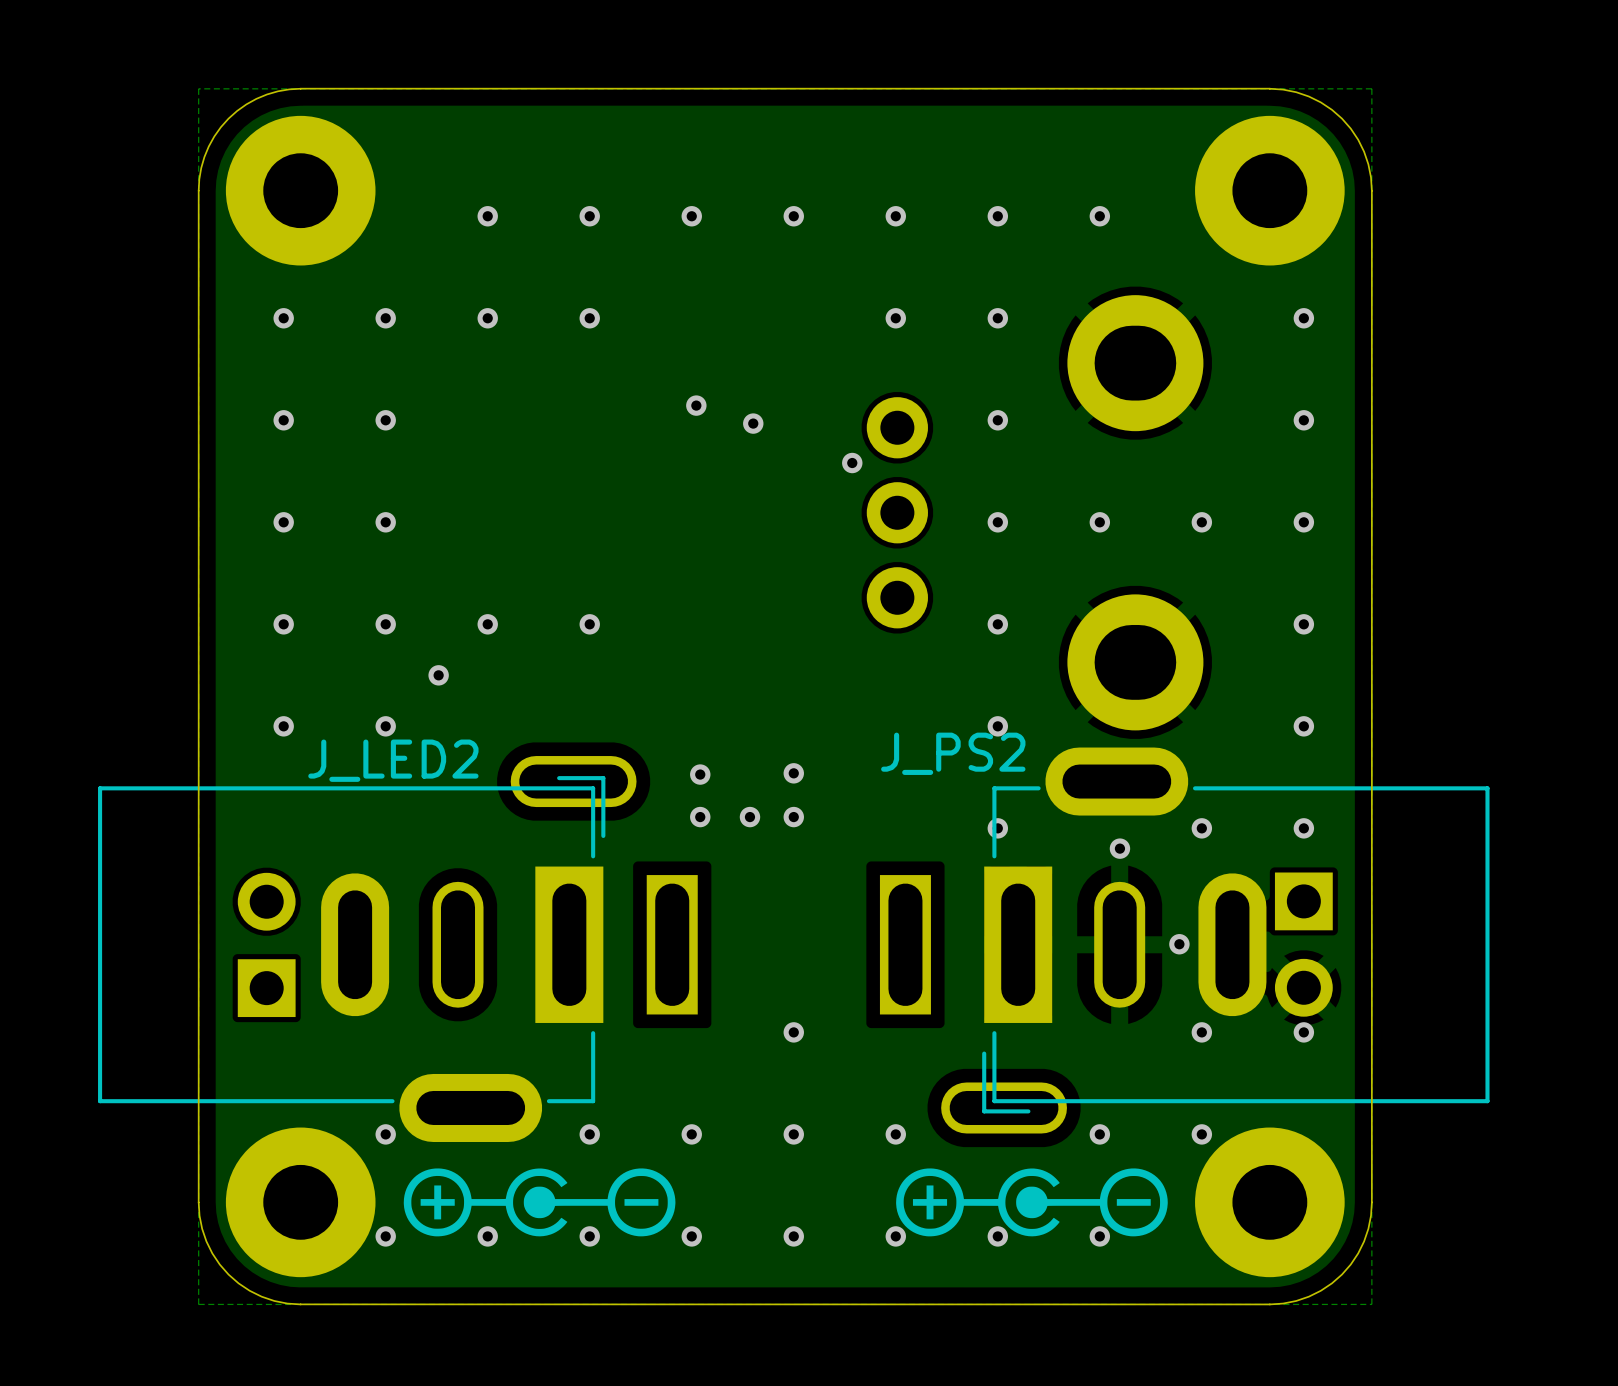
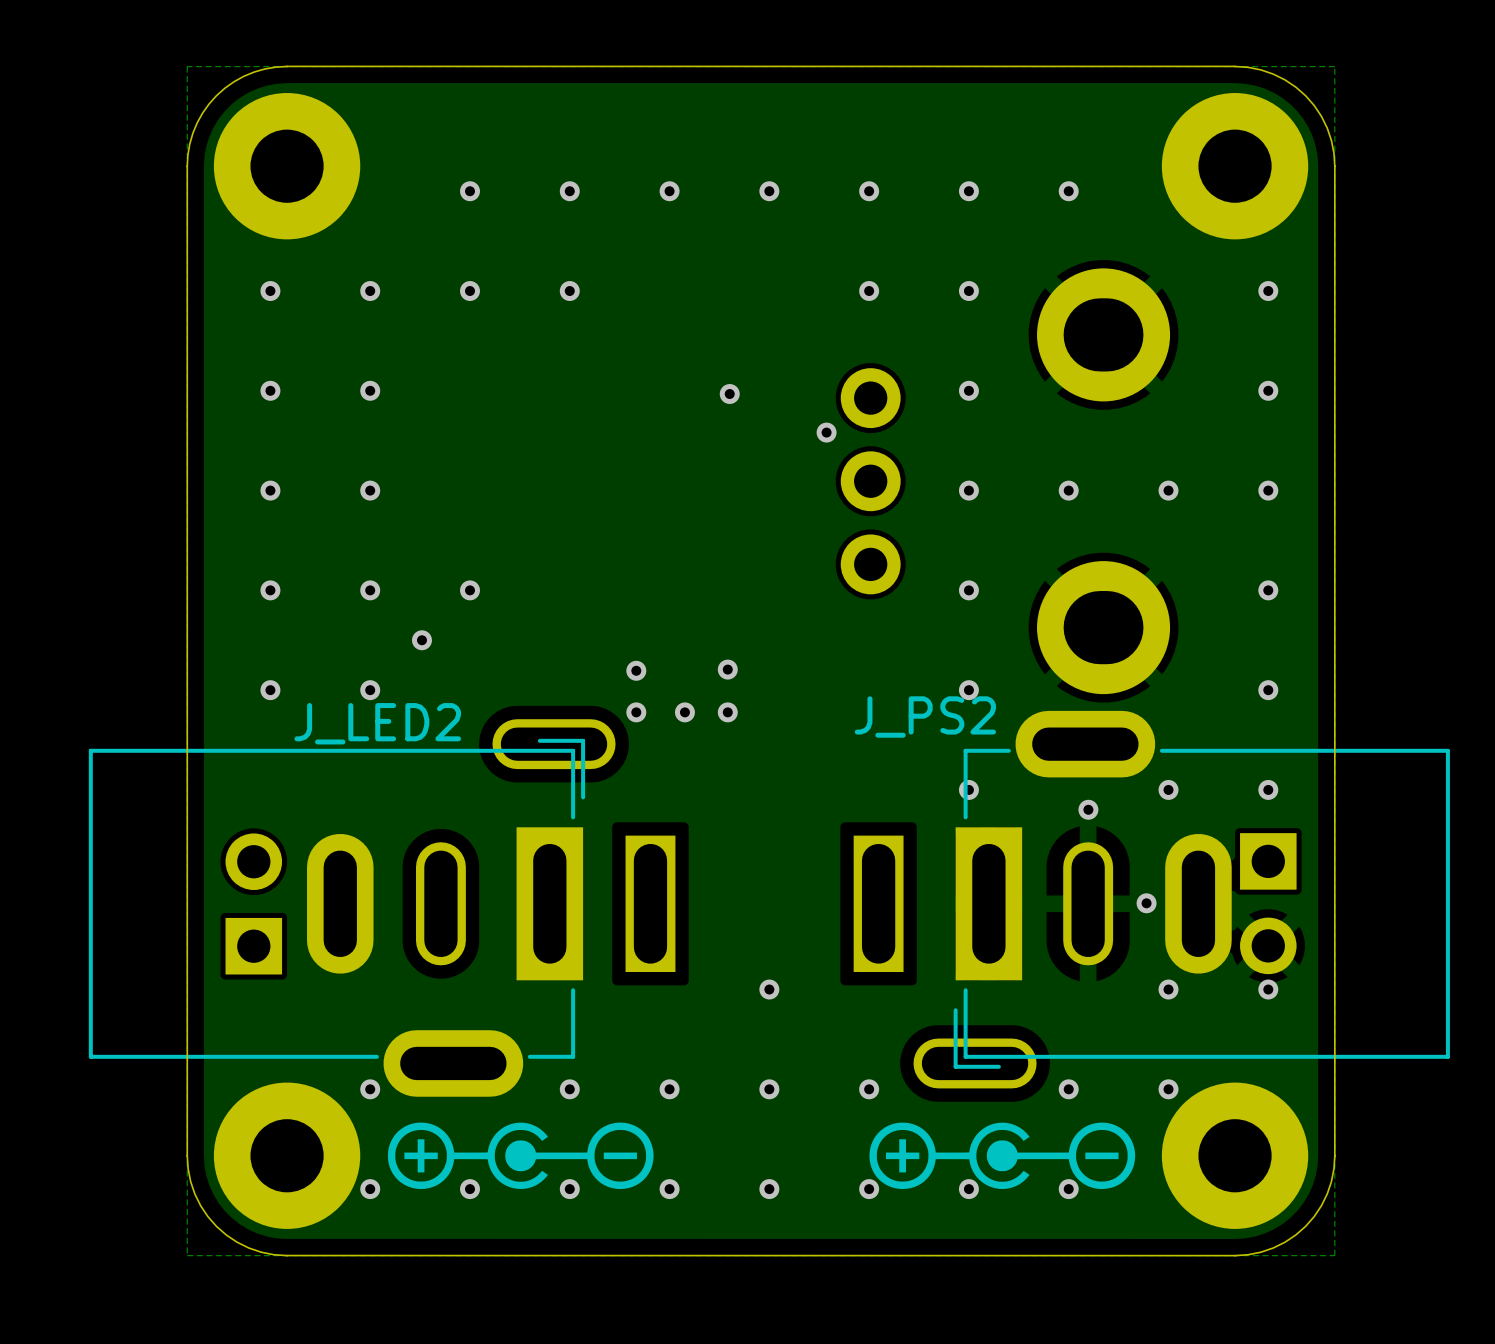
via: (696, 405) -> none
via: (589, 624) -> none
via: none -> (727, 669)
via: none -> (636, 670)
via: none -> (636, 712)
via: none -> (684, 712)
via: none -> (727, 712)
via: (793, 773) -> none
via: (700, 774) -> none
via: (700, 817) -> none
via: (749, 817) -> none
via: (793, 817) -> none

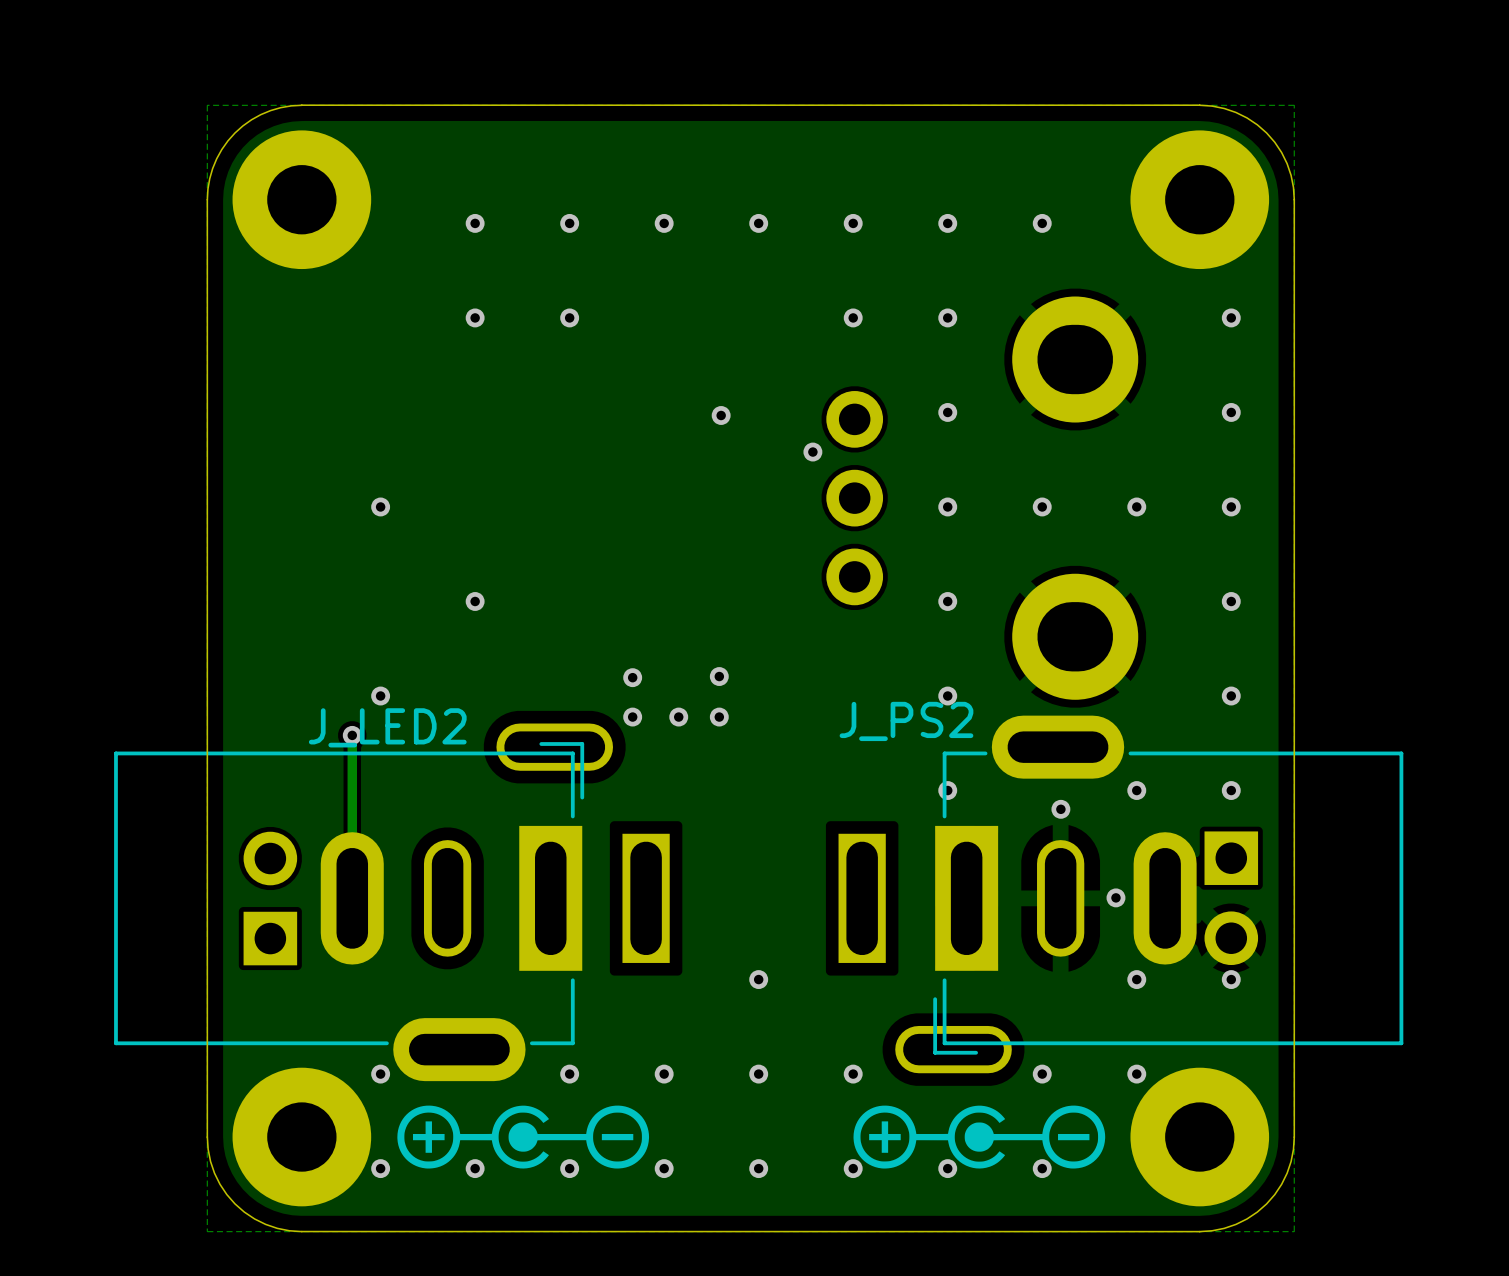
via: (270, 291) -> none
via: (370, 291) -> none
via: (270, 390) -> none
via: (370, 390) -> none
via: (270, 490) -> none
via: (270, 590) -> none
via: (370, 590) -> none
via: (421, 640) -> none
via: (270, 690) -> none
track: none -> (352, 735) (352, 898)
via: none -> (352, 735)

